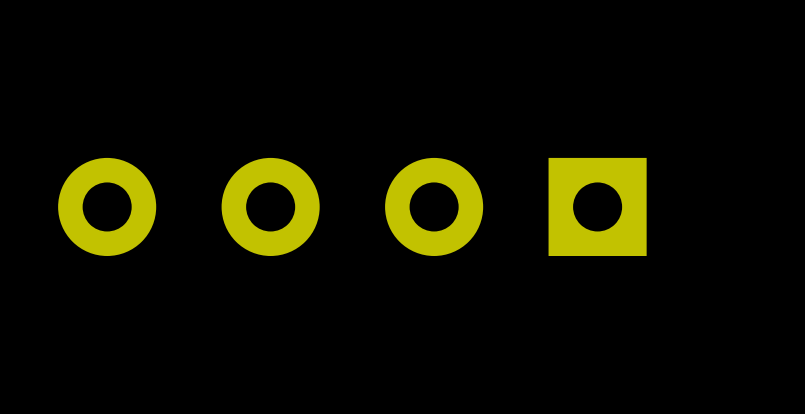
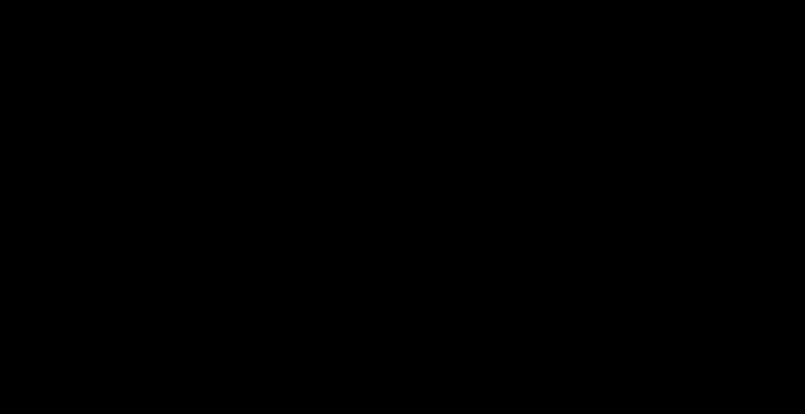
part: (352, 206) -> none

